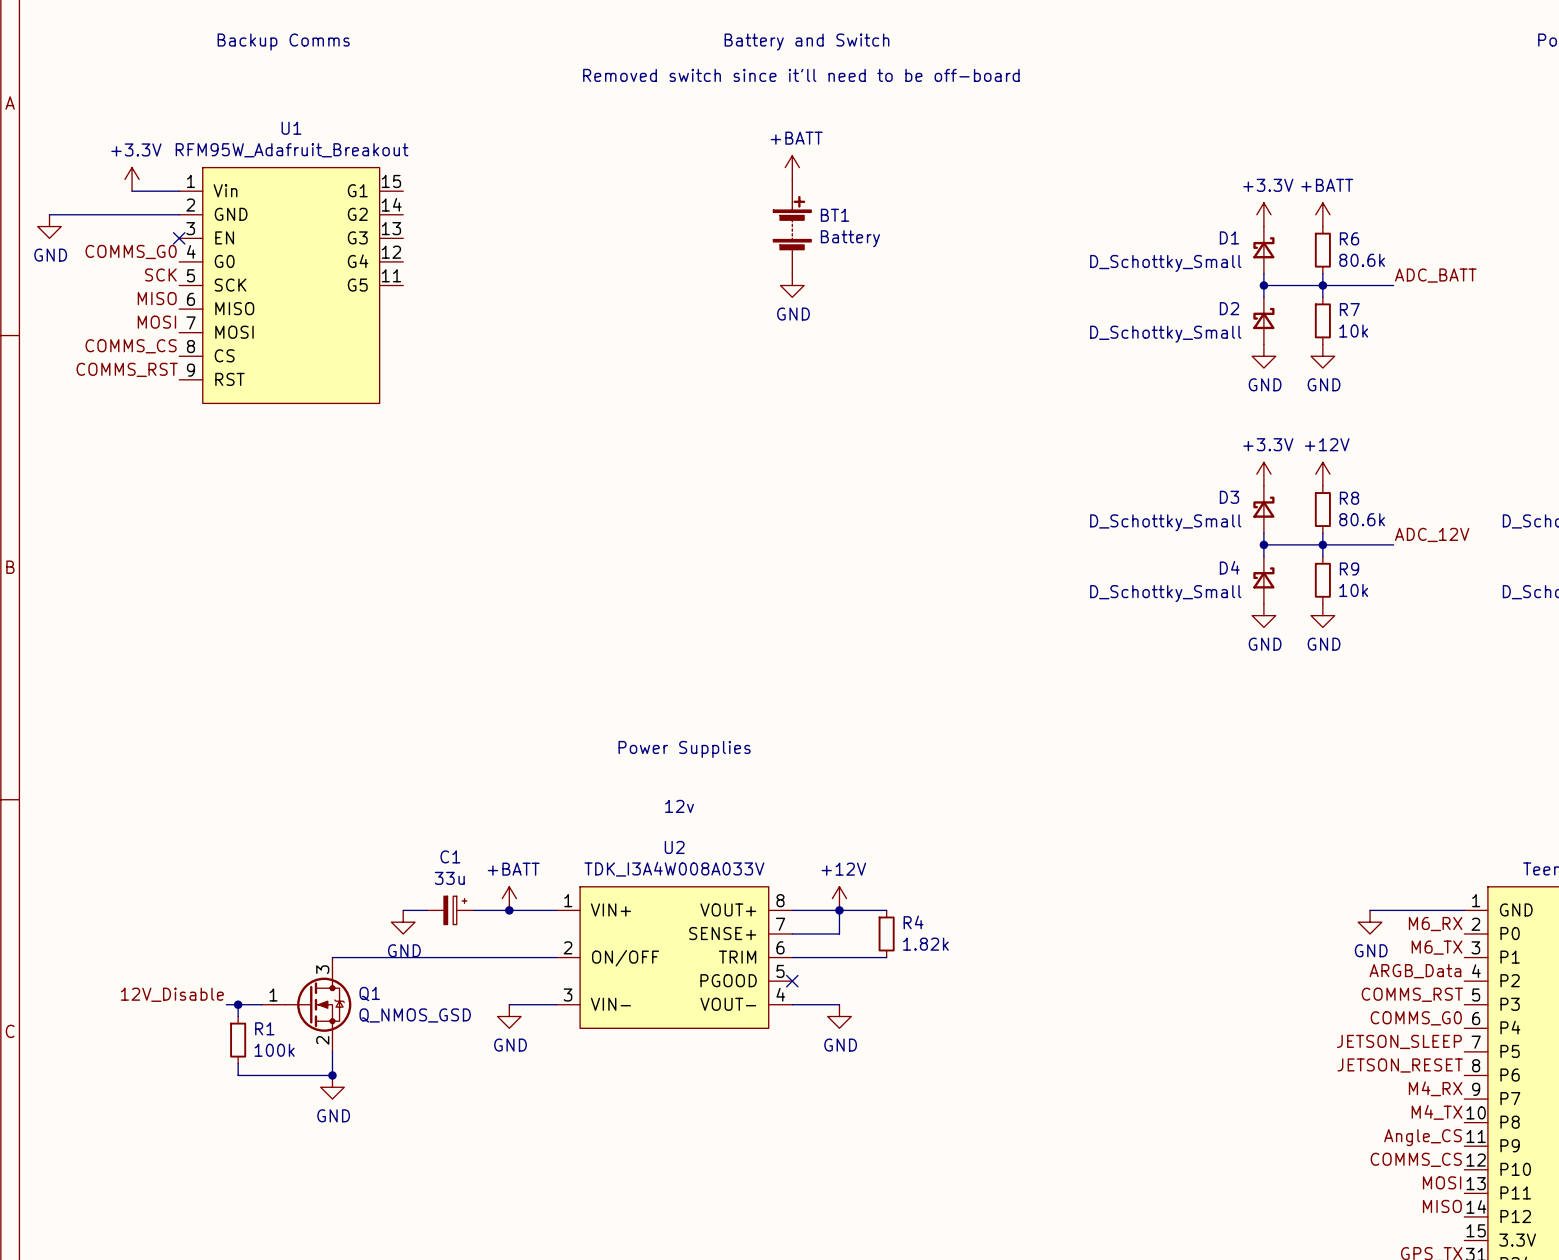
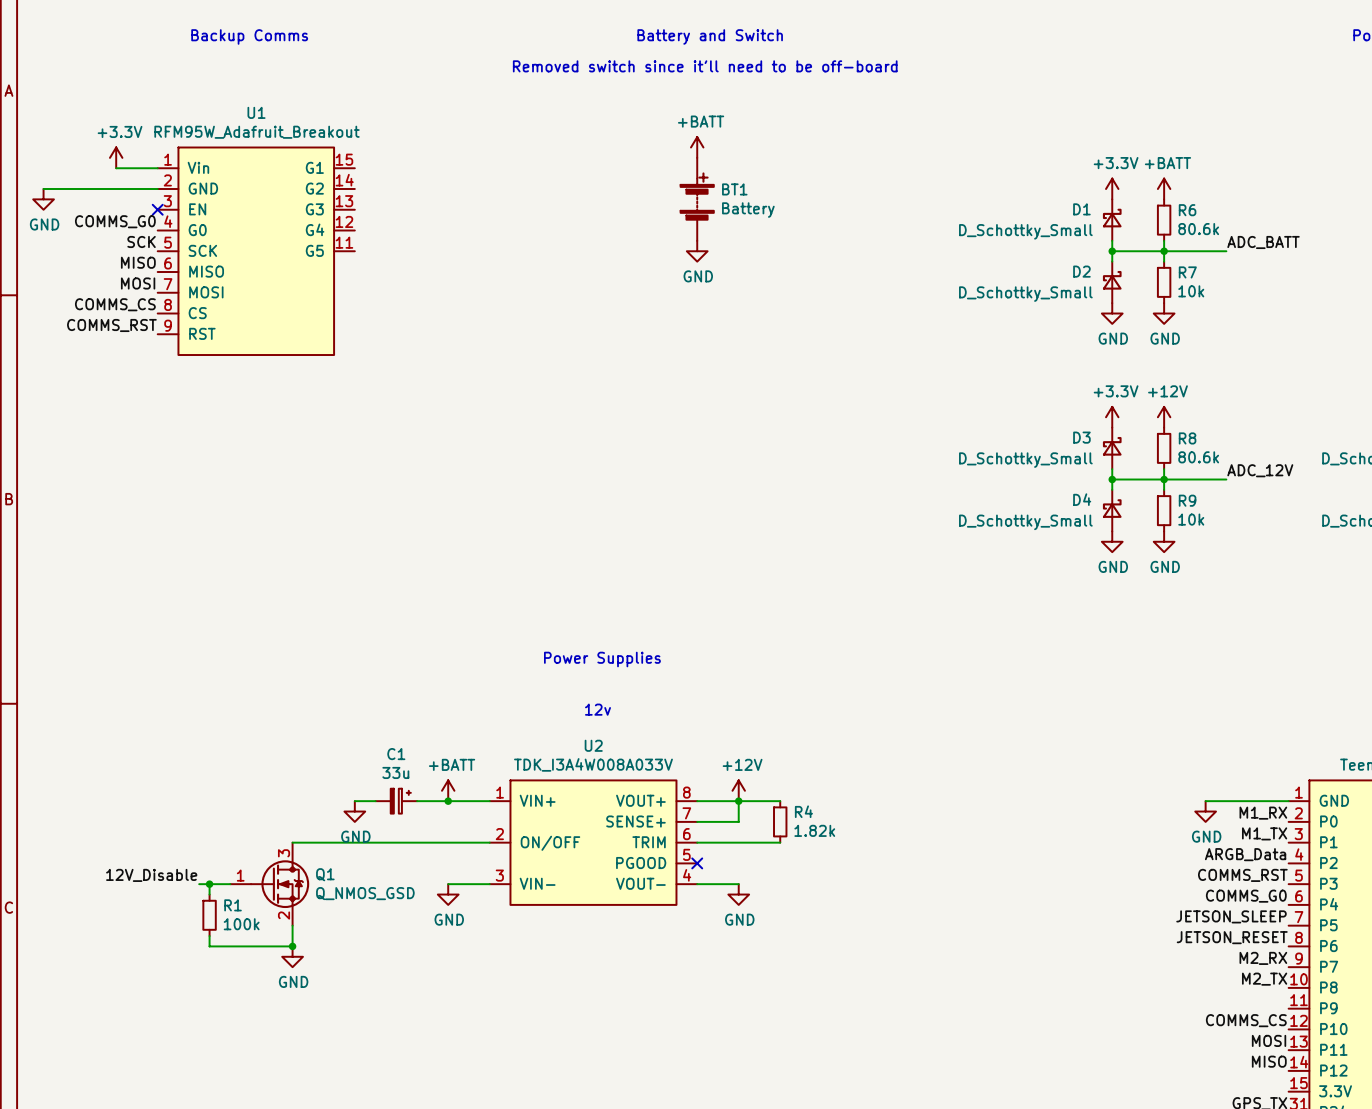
label: M6_RX (1435, 924) -> M1_RX (1263, 813)
label: M6_TX (1437, 947) -> M1_TX (1264, 833)
label: M4_RX (1435, 1088) -> M2_RX (1263, 958)
label: M4_TX (1437, 1112) -> M2_TX (1264, 979)
label: Angle_CS (1423, 1137) -> none

